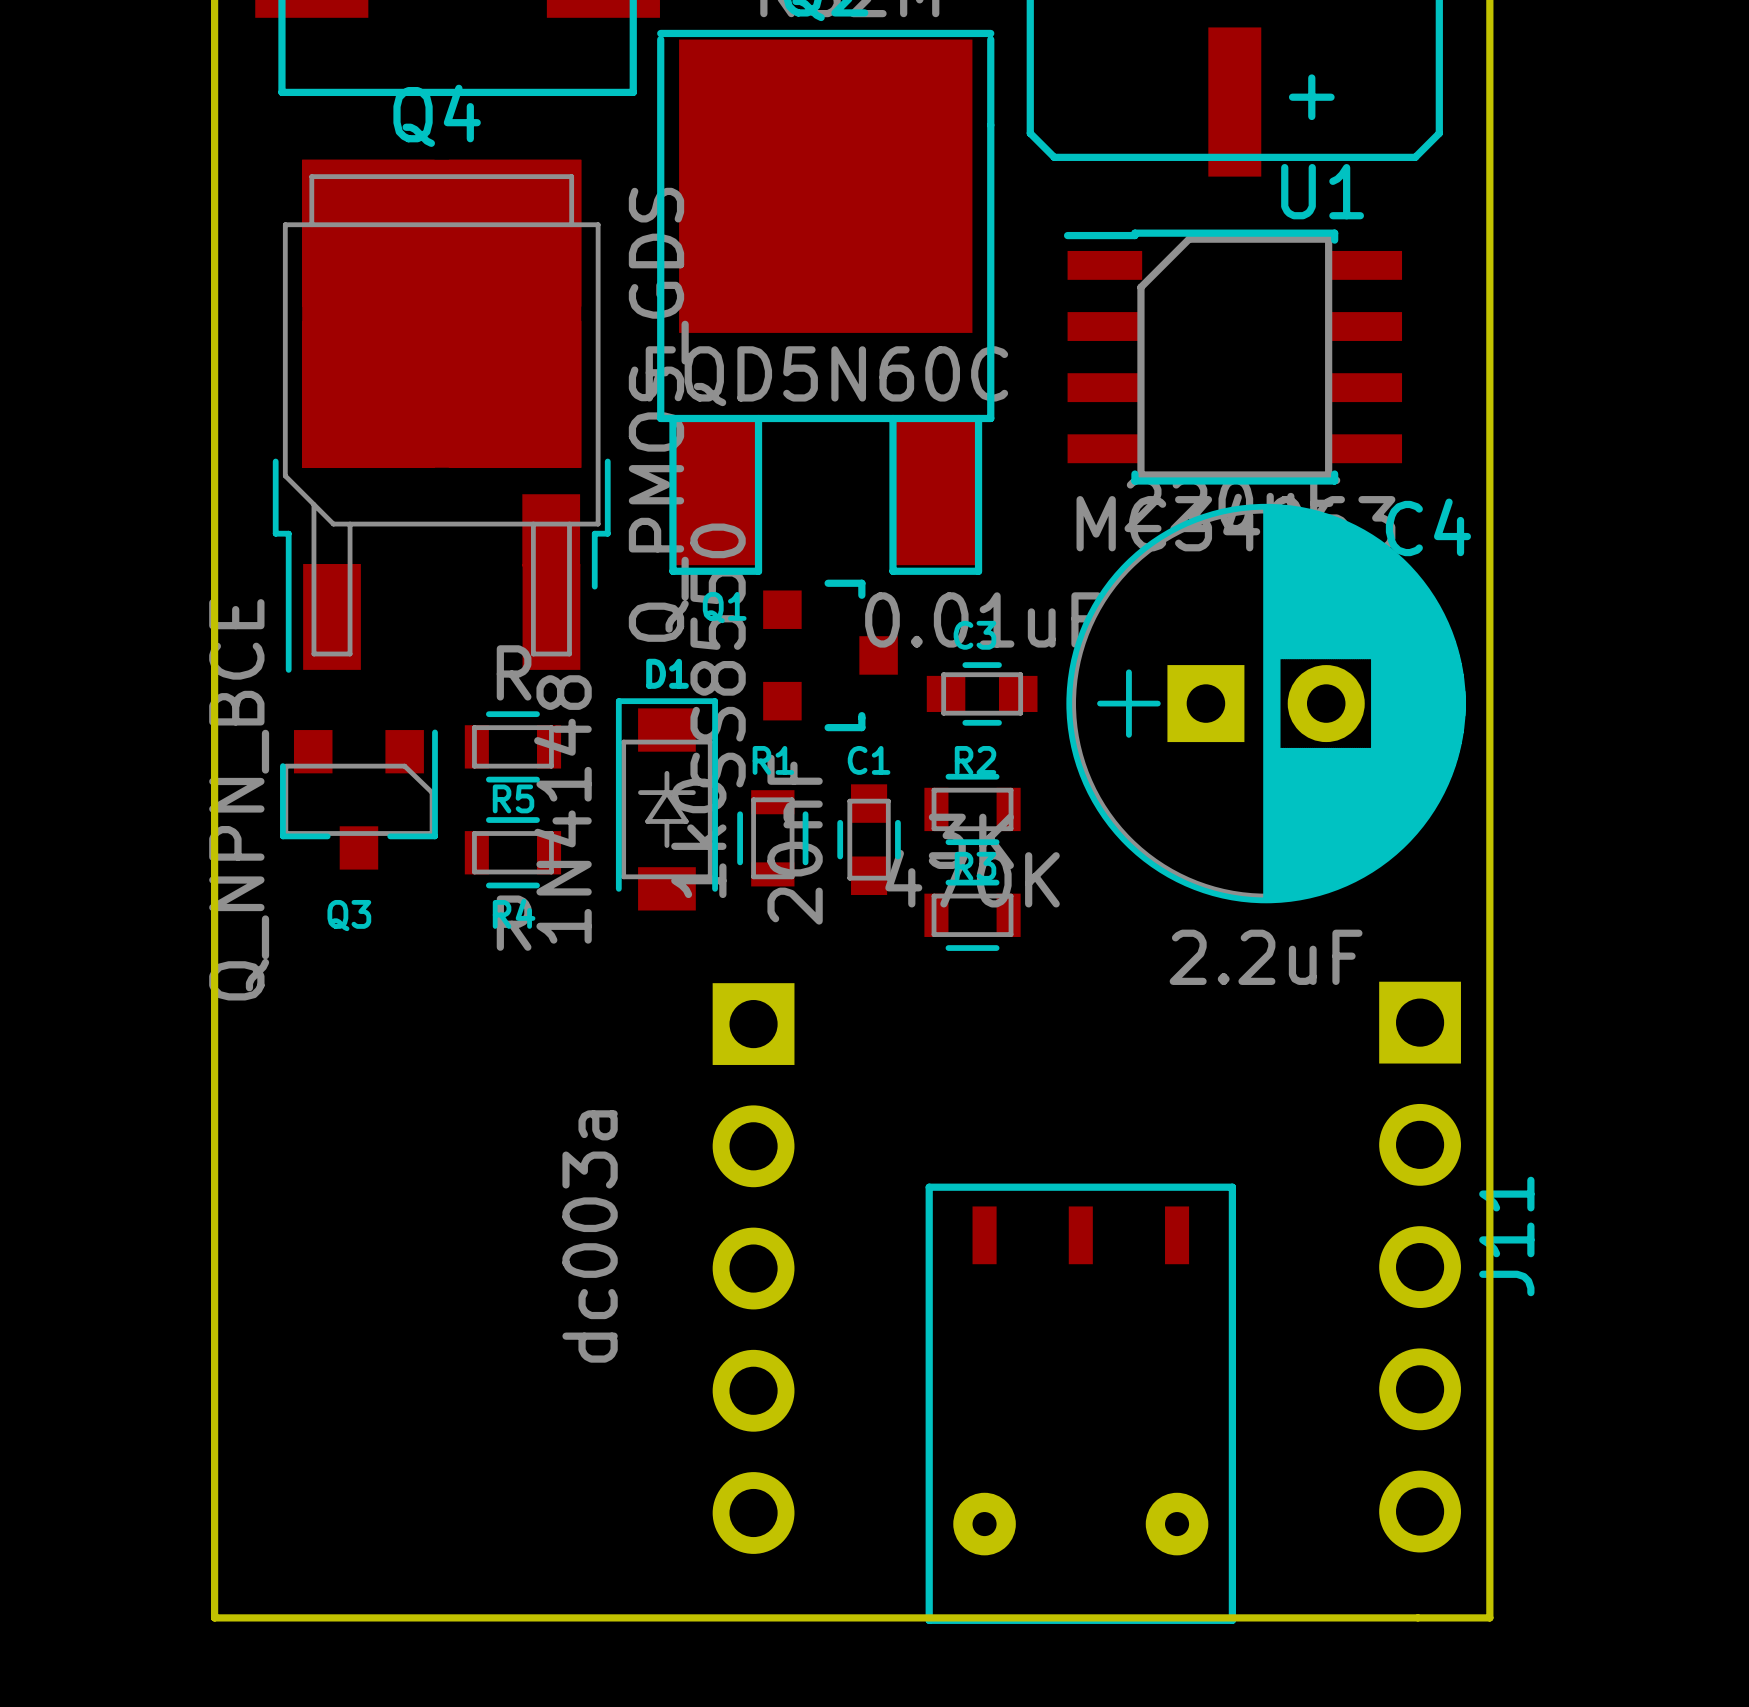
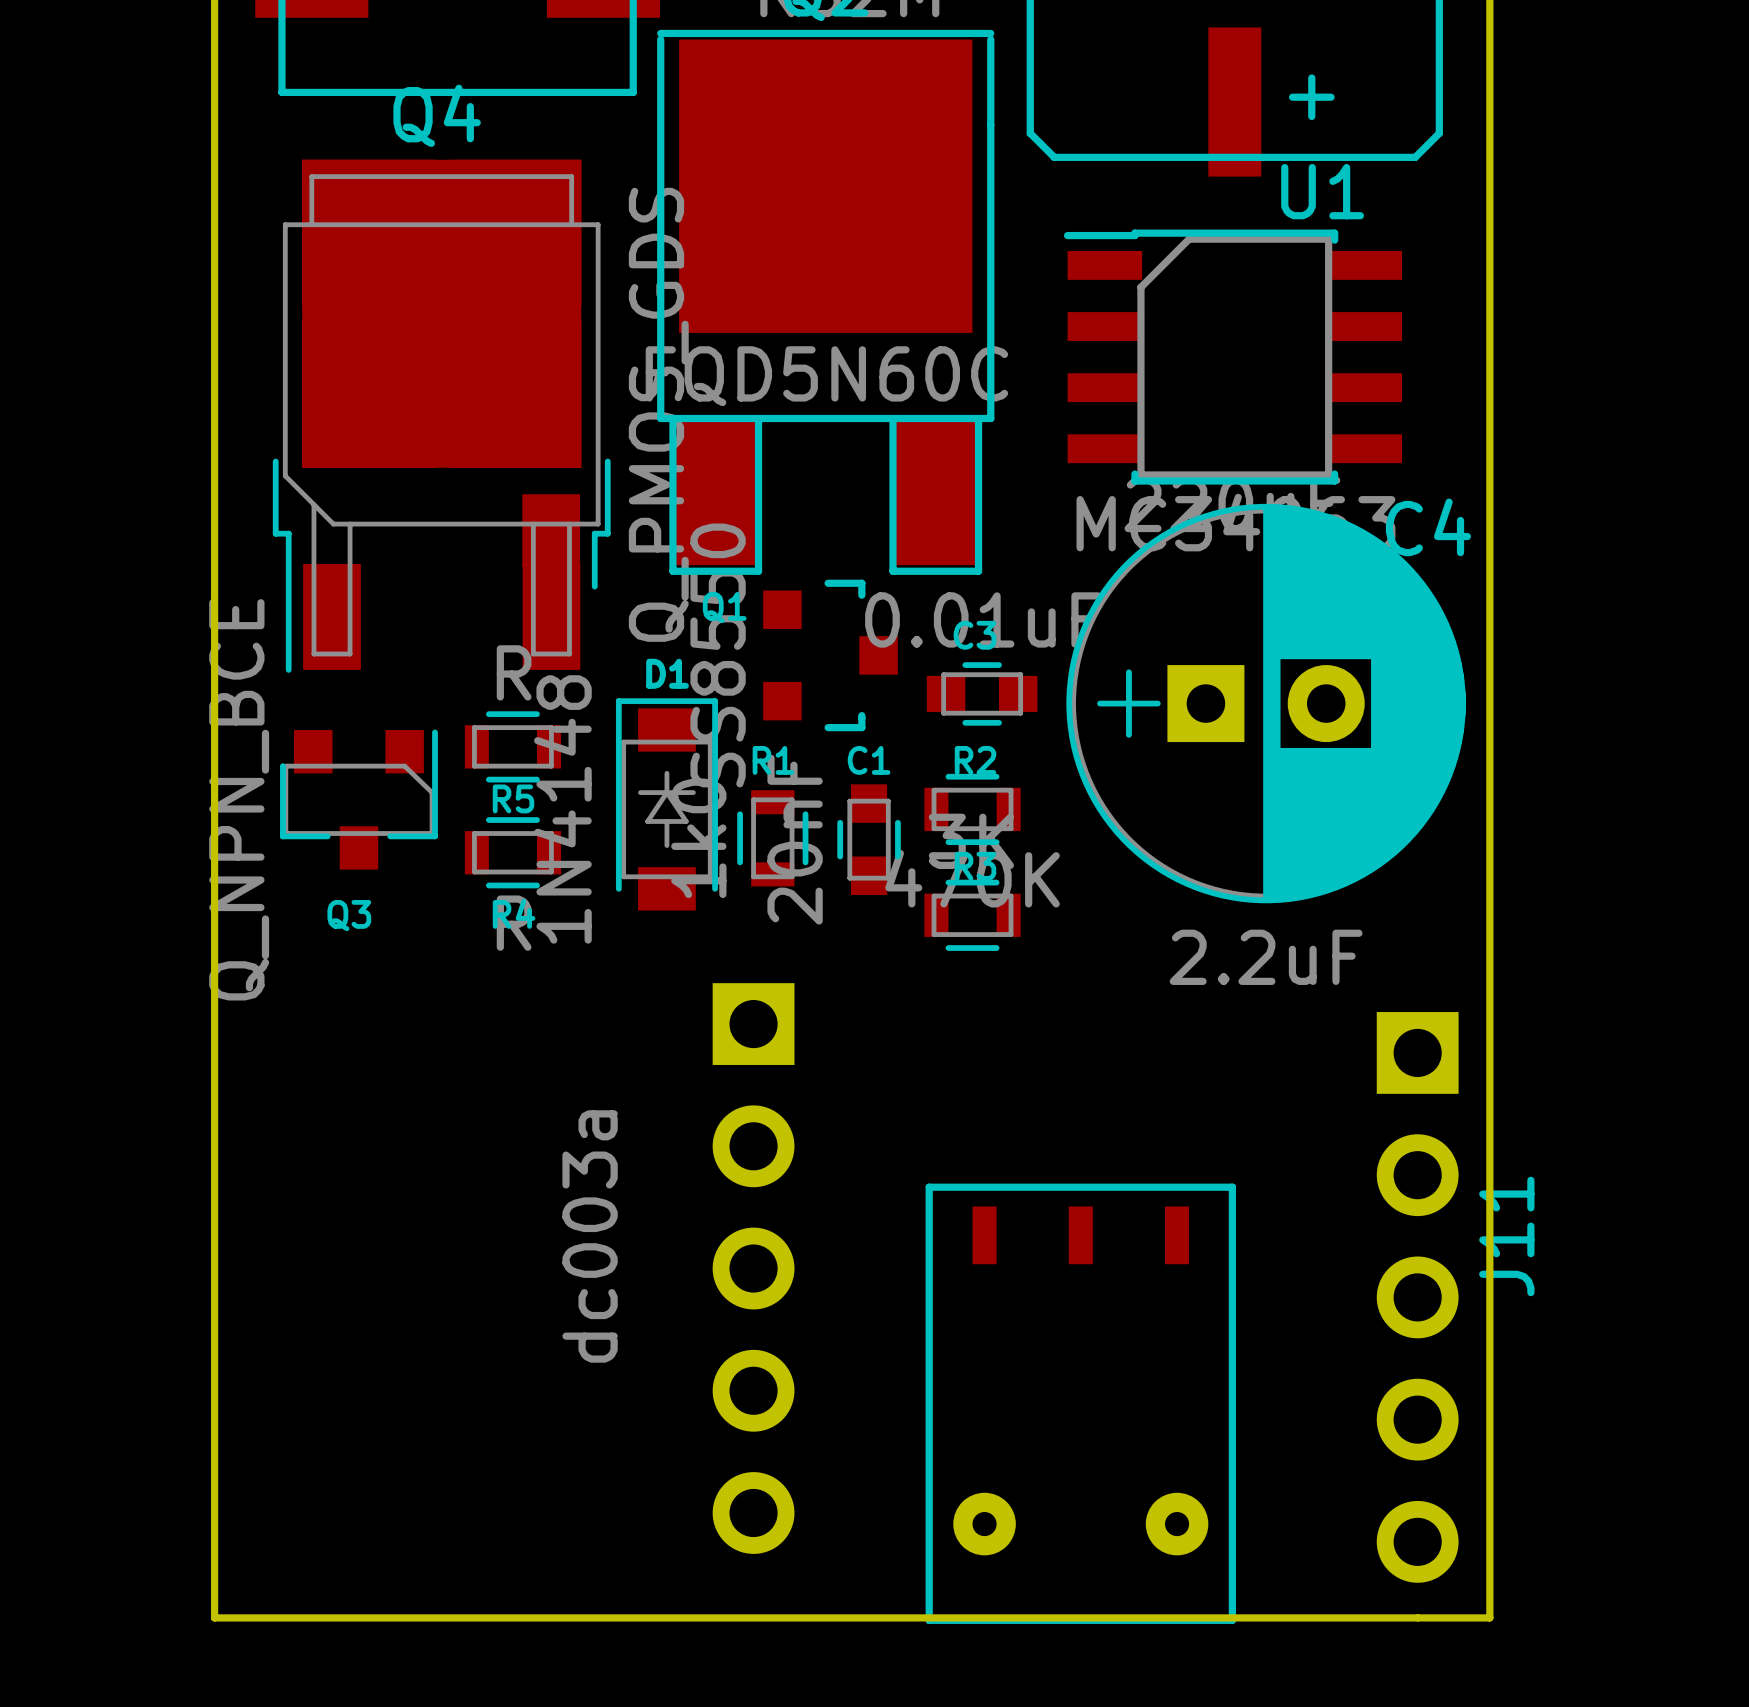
part position: (1420, 1267) -> (1417, 1297)

